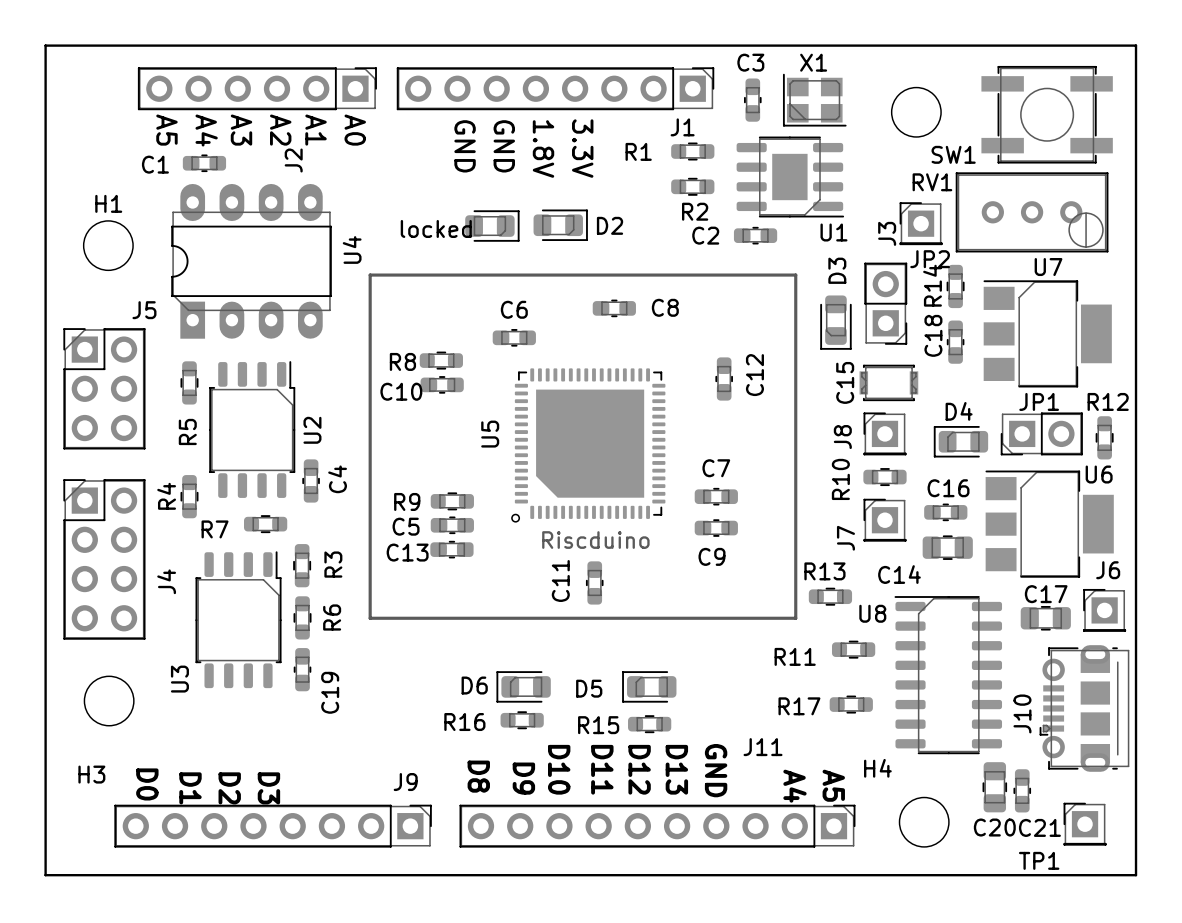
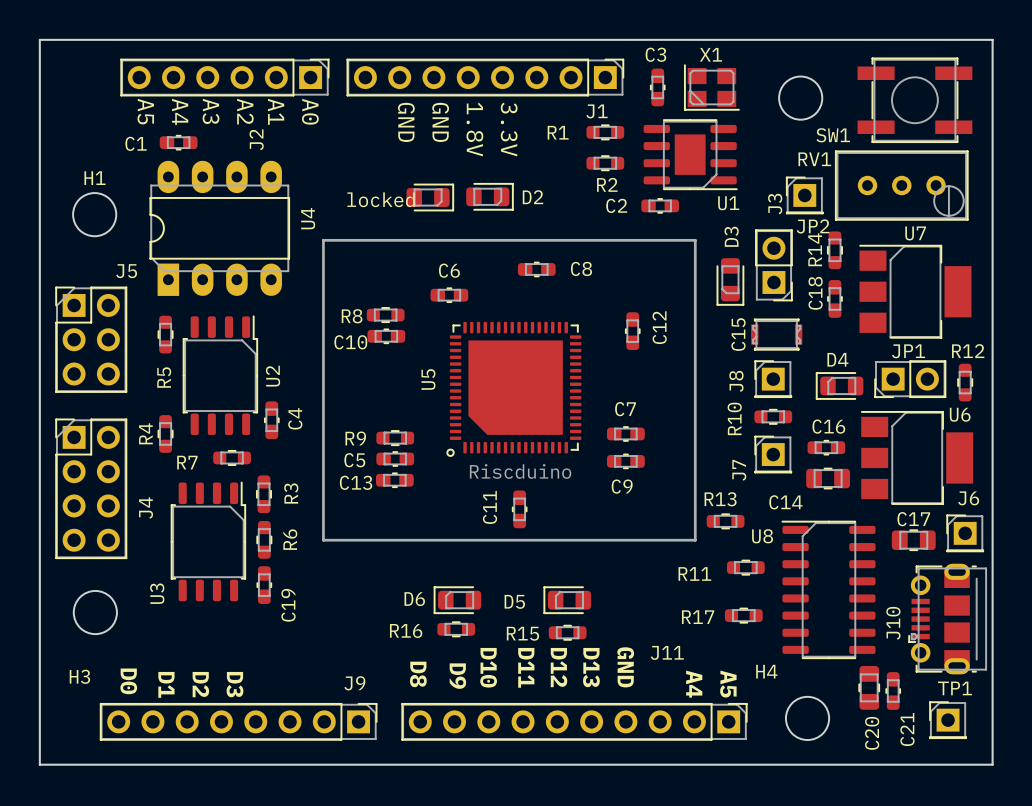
C20 name rotation: 0° (994, 827) -> 90° counterclockwise (872, 733)
C21 name rotation: 0° (1039, 827) -> 90° counterclockwise (907, 729)
TP1 name position: TP1 (1039, 860) -> TP1 (955, 688)

